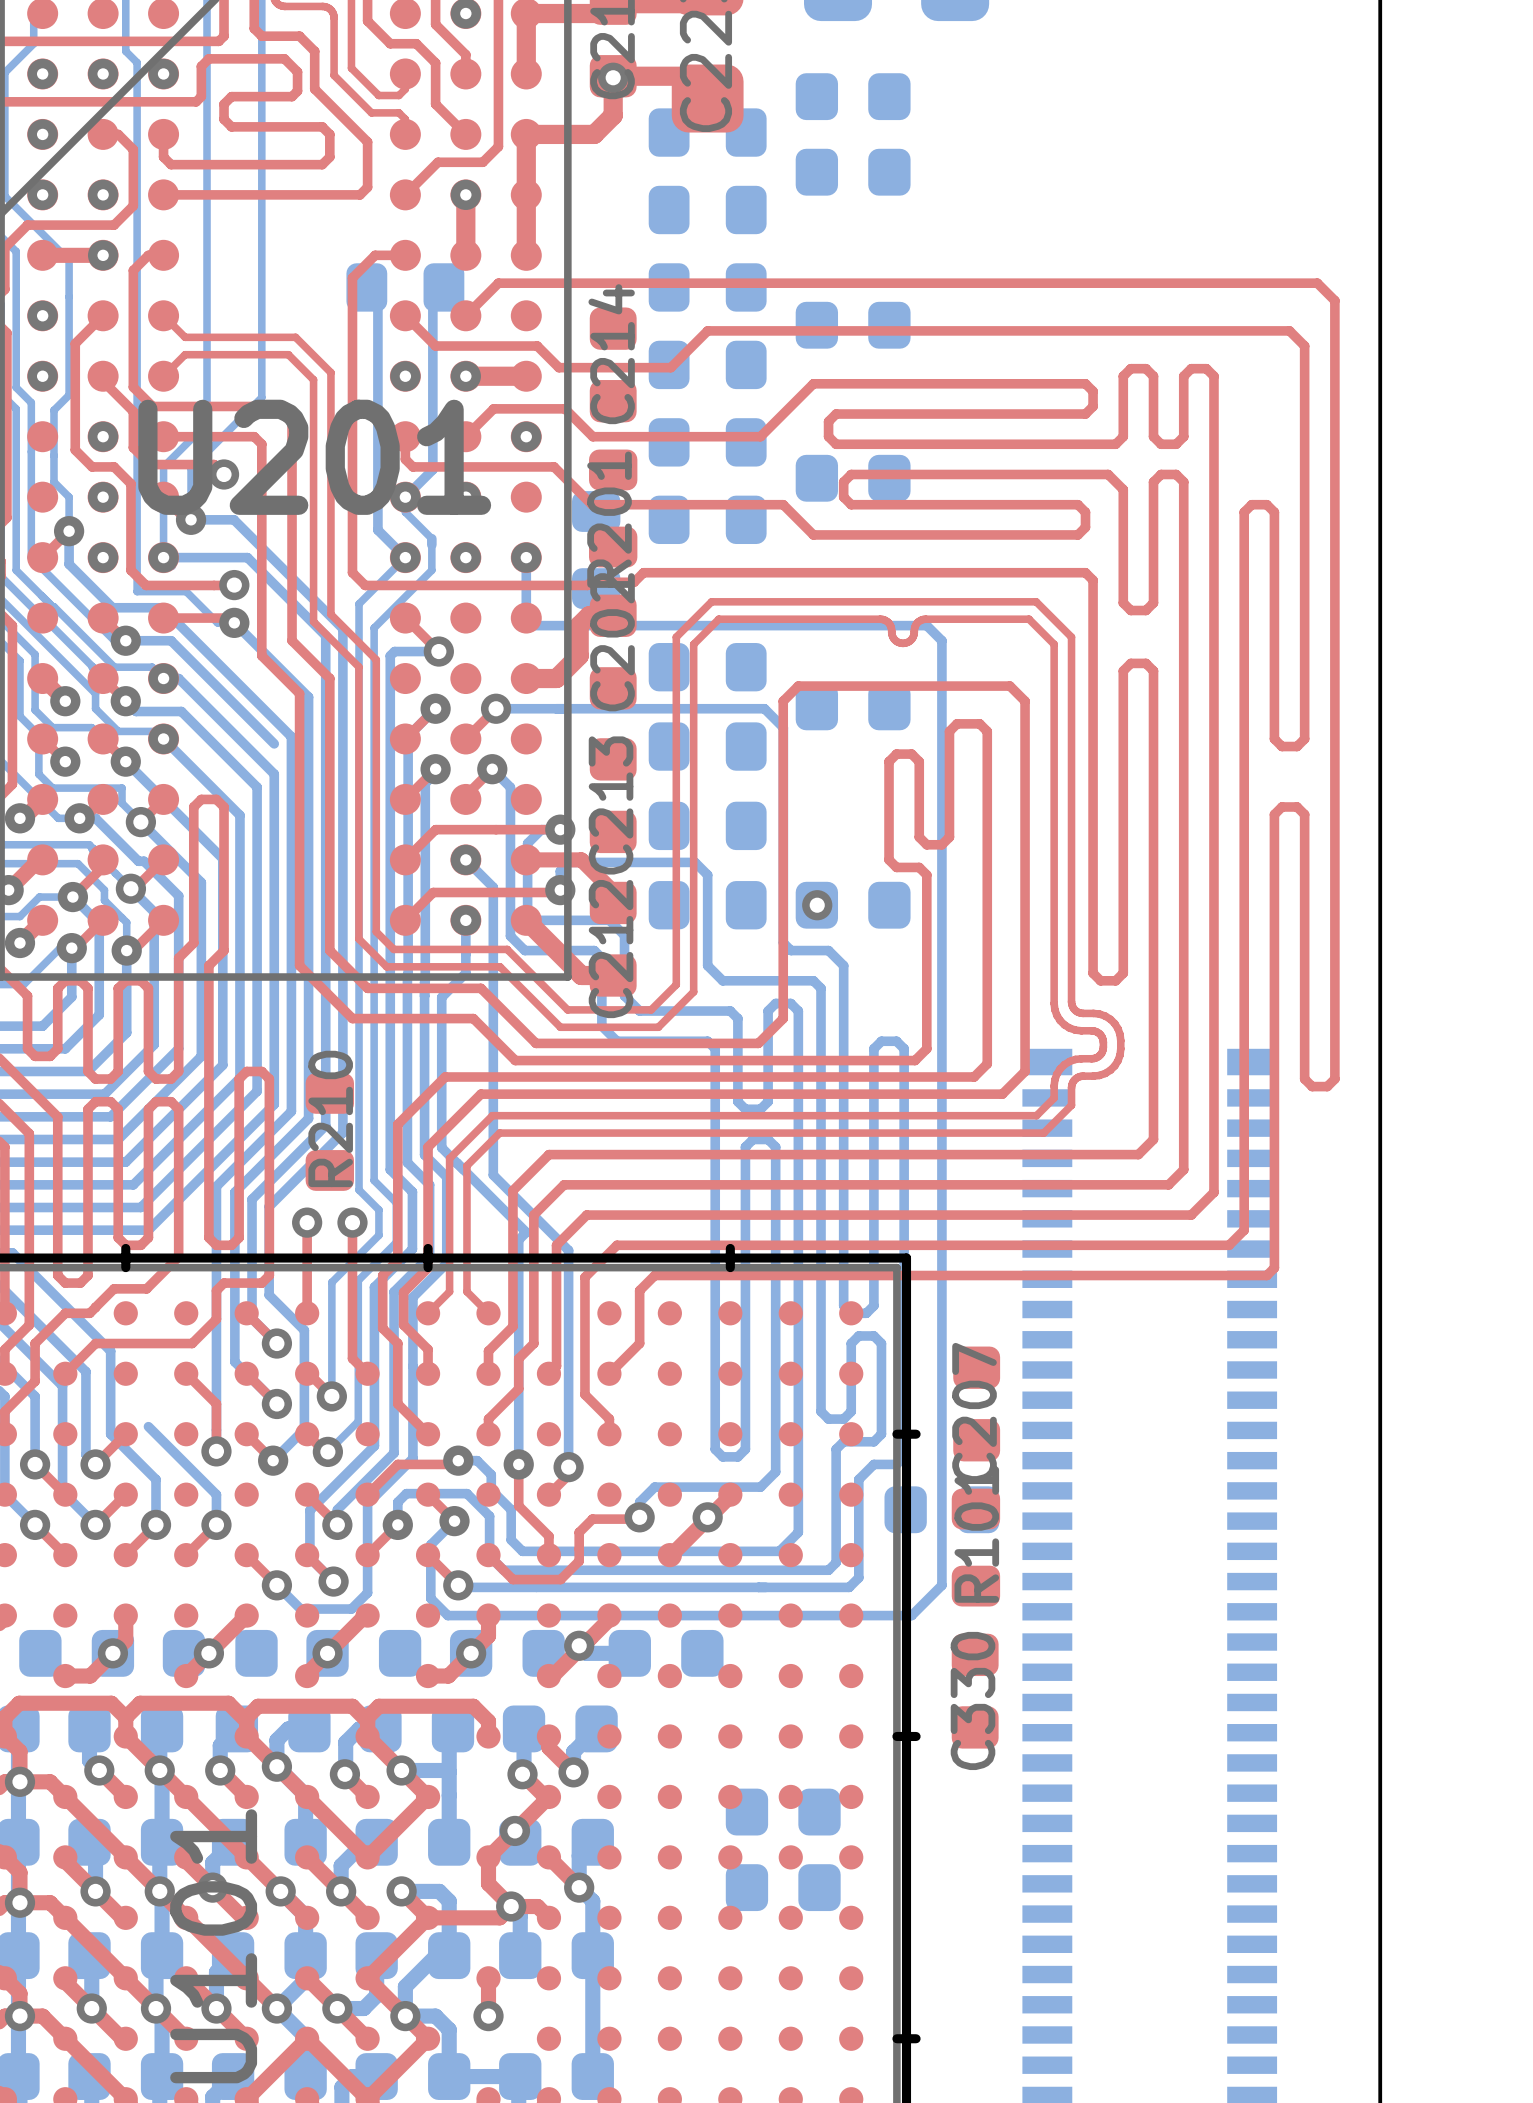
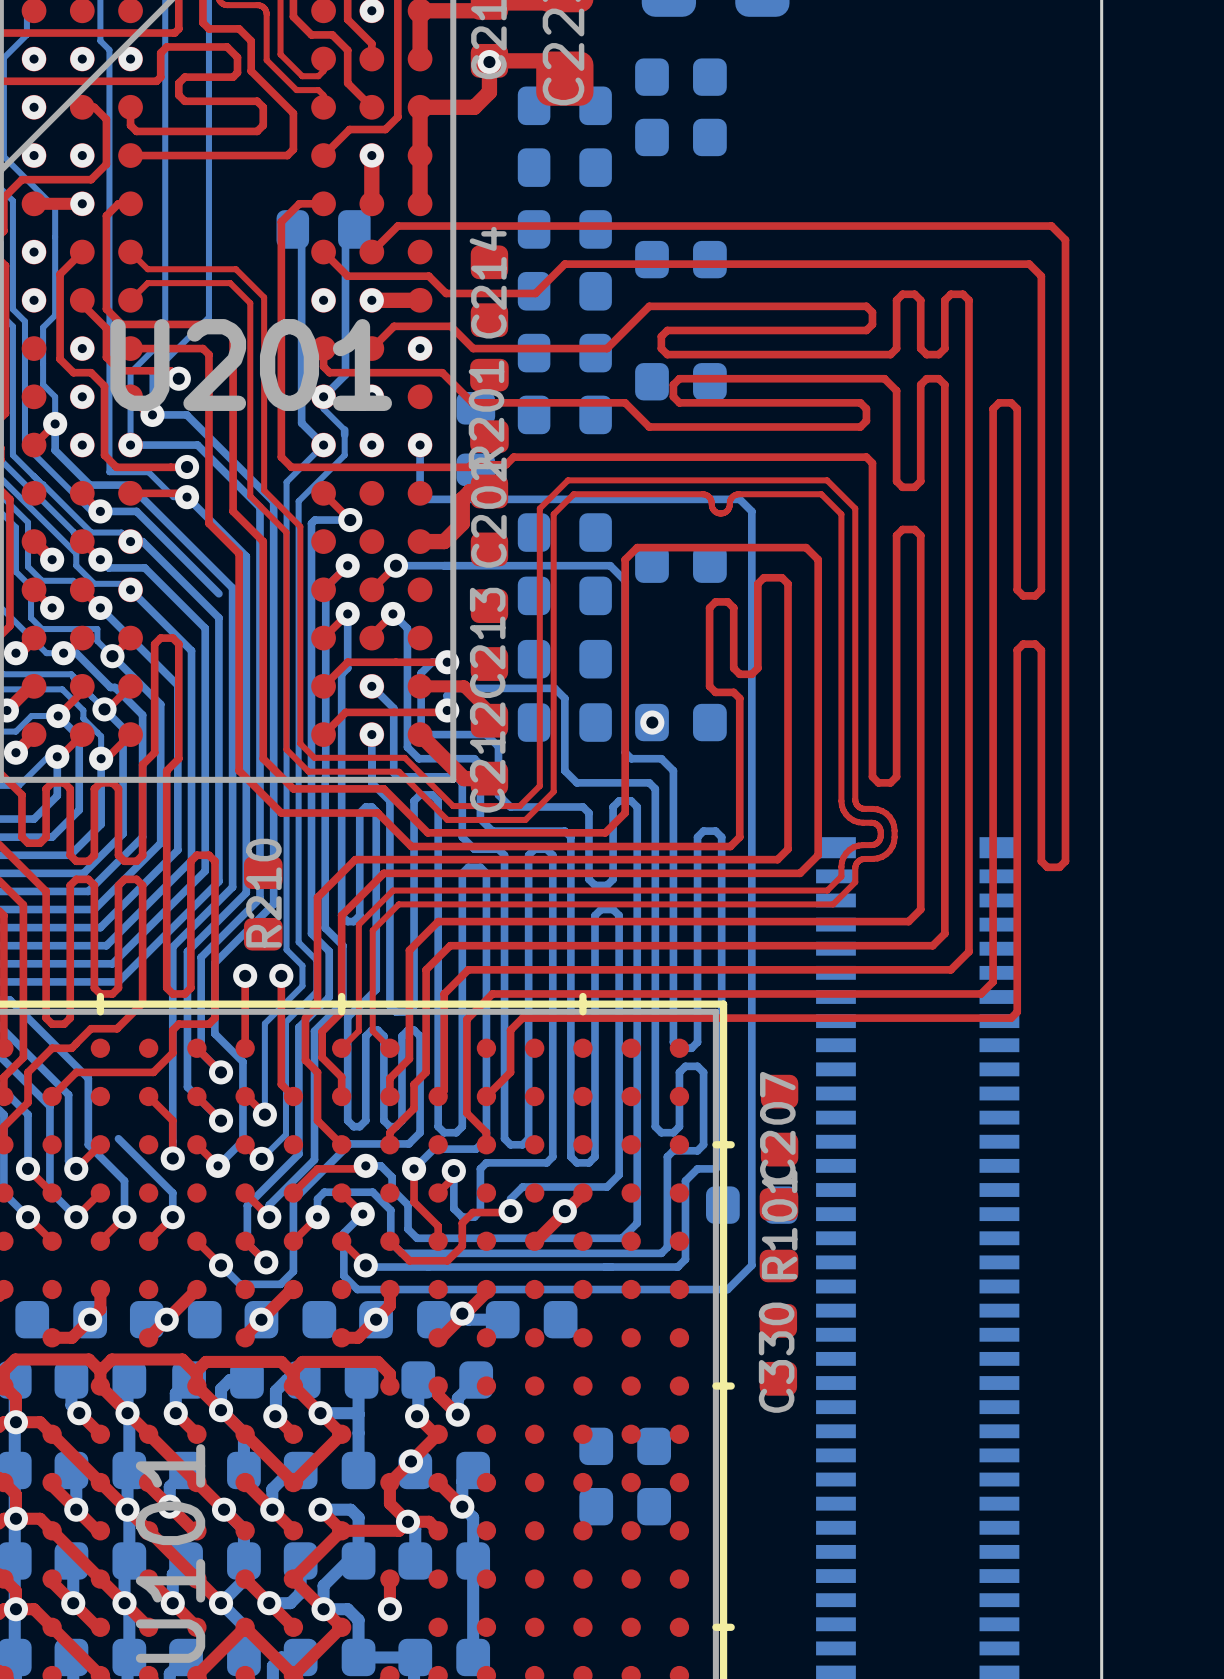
bottom track: (435, 772) (425, 783) (425, 981) -> none
bottom track: (493, 968) (493, 1175) (568, 1250) (568, 1467) -> (393, 772) (397, 776) (456, 776) (462, 782) (462, 837) (474, 849) (498, 849) (504, 855) (504, 1138) (510, 1144) (522, 1144) (528, 1138) (528, 855) (534, 849) (546, 849) (552, 855) (552, 1156) (546, 1162) (486, 1162) (480, 1168) (480, 1211) (474, 1217) (462, 1217) (453, 1208) (453, 1171)
bottom track: (465, 973) (441, 997) (441, 1147) (526, 1232) (518, 1239) -> (371, 776) (371, 782) (389, 800) (389, 1006) (395, 1012) (408, 1012) (414, 1006)
bottom track: (424, 982) (424, 1154) (446, 1177) (446, 1263) -> (347, 616) (347, 668) (341, 674) (341, 915) (347, 921) (353, 921) (359, 915) (359, 813) (365, 806) (371, 806) (376, 811) (376, 989) (357, 1008)
bottom track: (518, 1260) (518, 1464) -> (414, 989) (414, 800) (420, 794) (432, 794) (438, 800) (438, 1126) (444, 1132) (456, 1132) (462, 1126) (462, 873) (468, 867) (480, 867) (486, 873) (486, 1138) (476, 1149) (433, 1149) (414, 1168)
bottom track: (435, 1274) (412, 1297) (412, 1458) -> (347, 1017) (347, 1120) (353, 1126) (359, 1126) (365, 1120) (365, 1036) (371, 1030) (377, 1030) (383, 1036) (383, 1120) (389, 1126) (395, 1126) (401, 1120) (401, 1036) (408, 1030) (414, 1030) (420, 1036) (420, 1132) (408, 1143) (349, 1143) (329, 1164)

